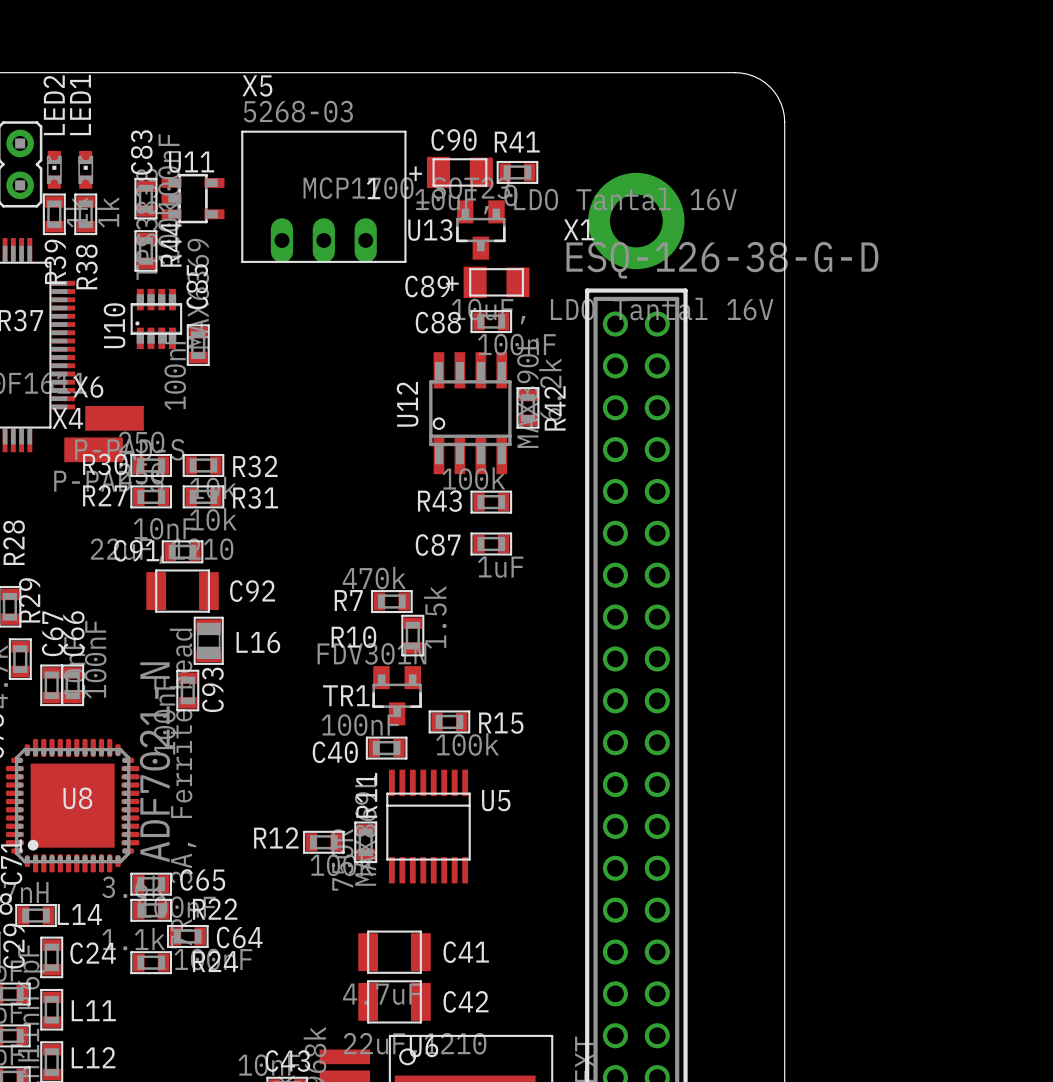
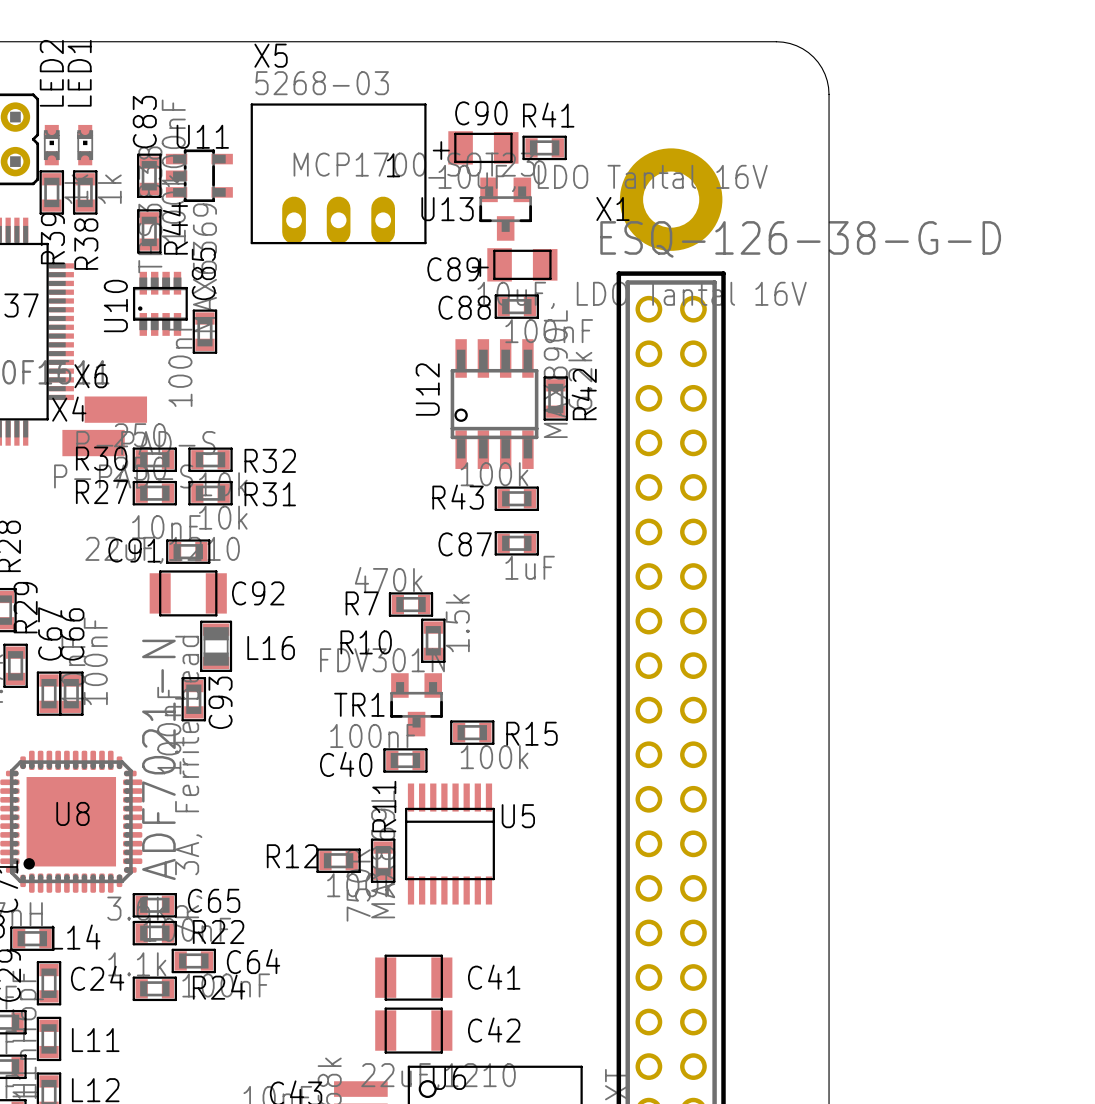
C41 value: 4.7uF (382, 994) -> none

